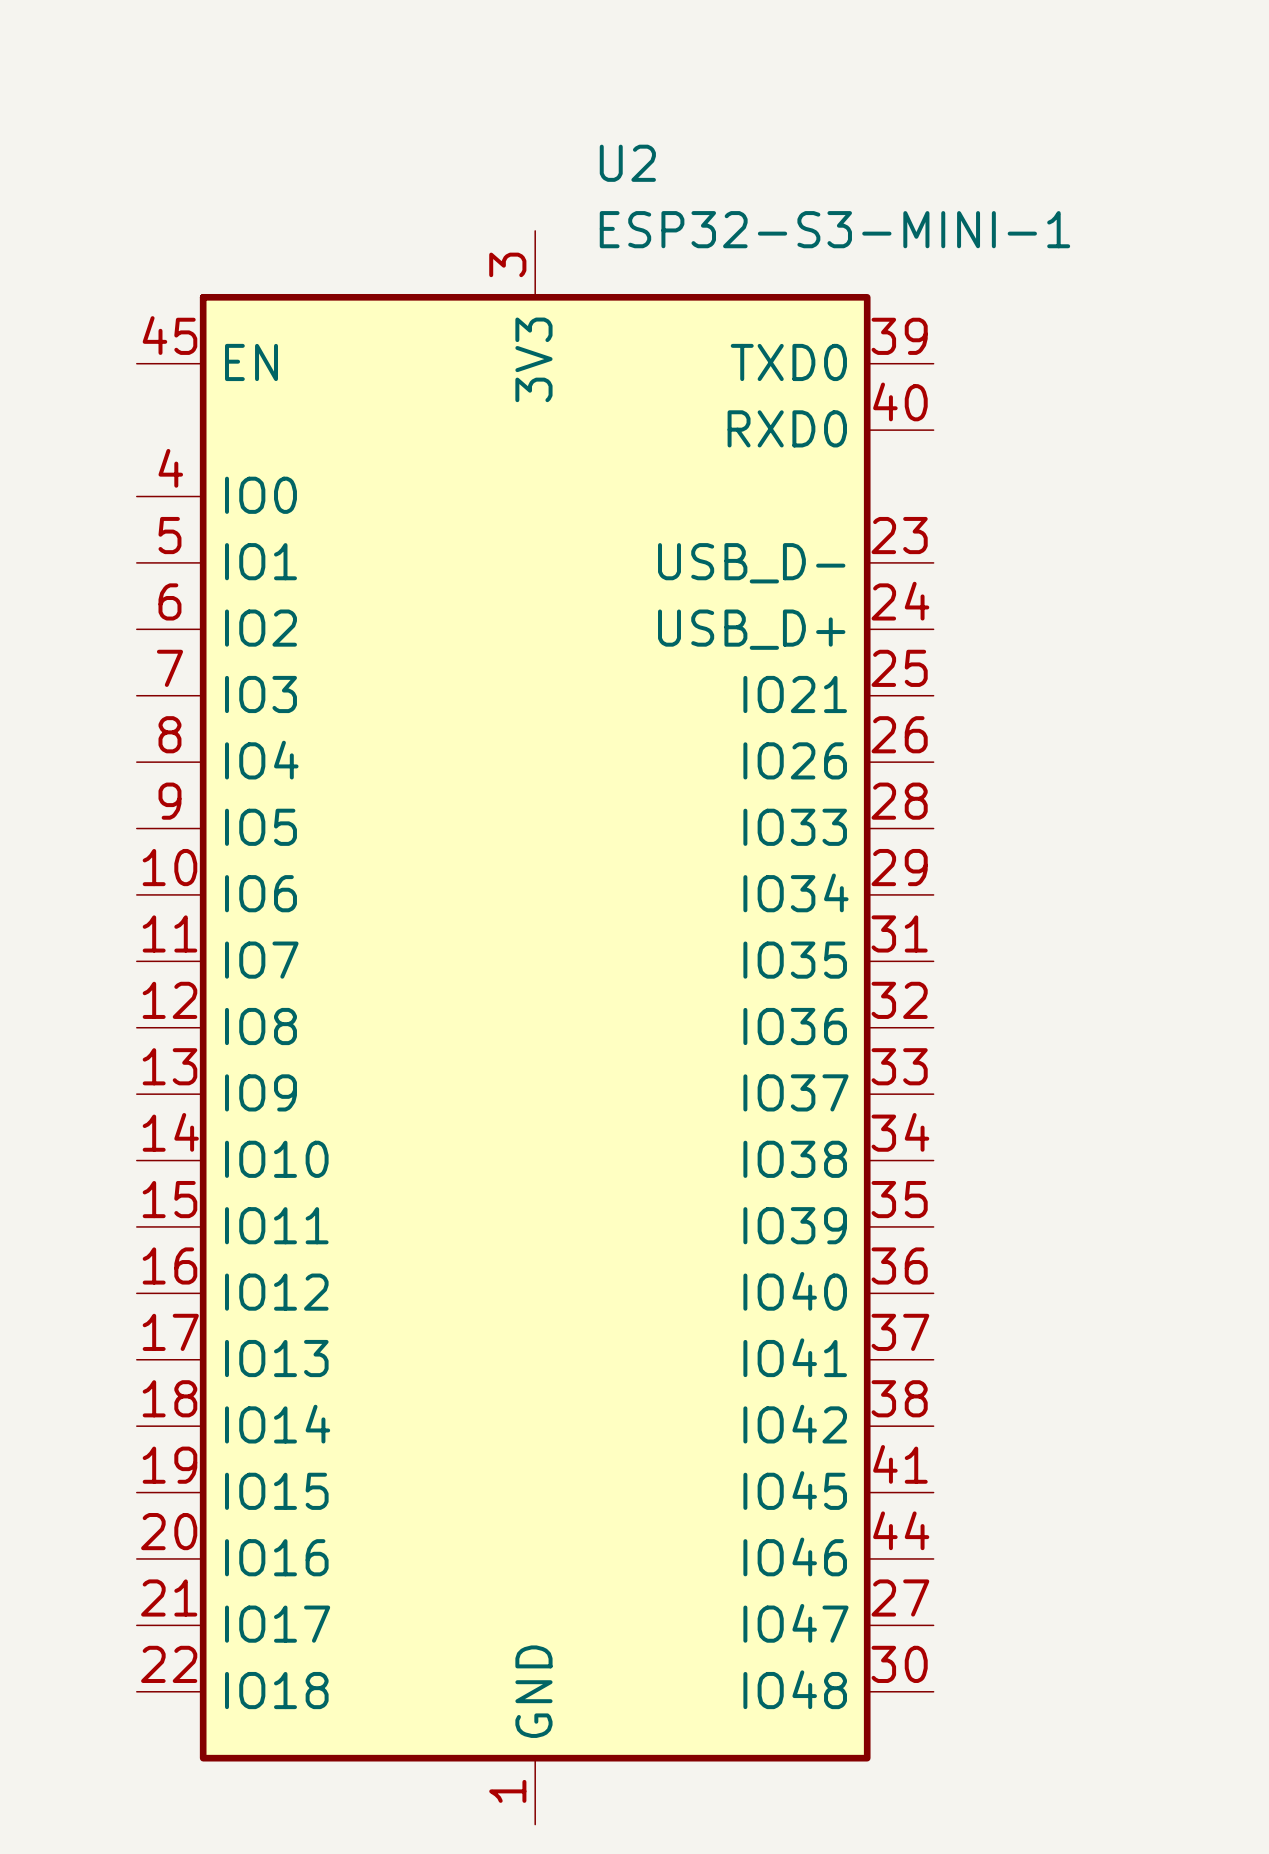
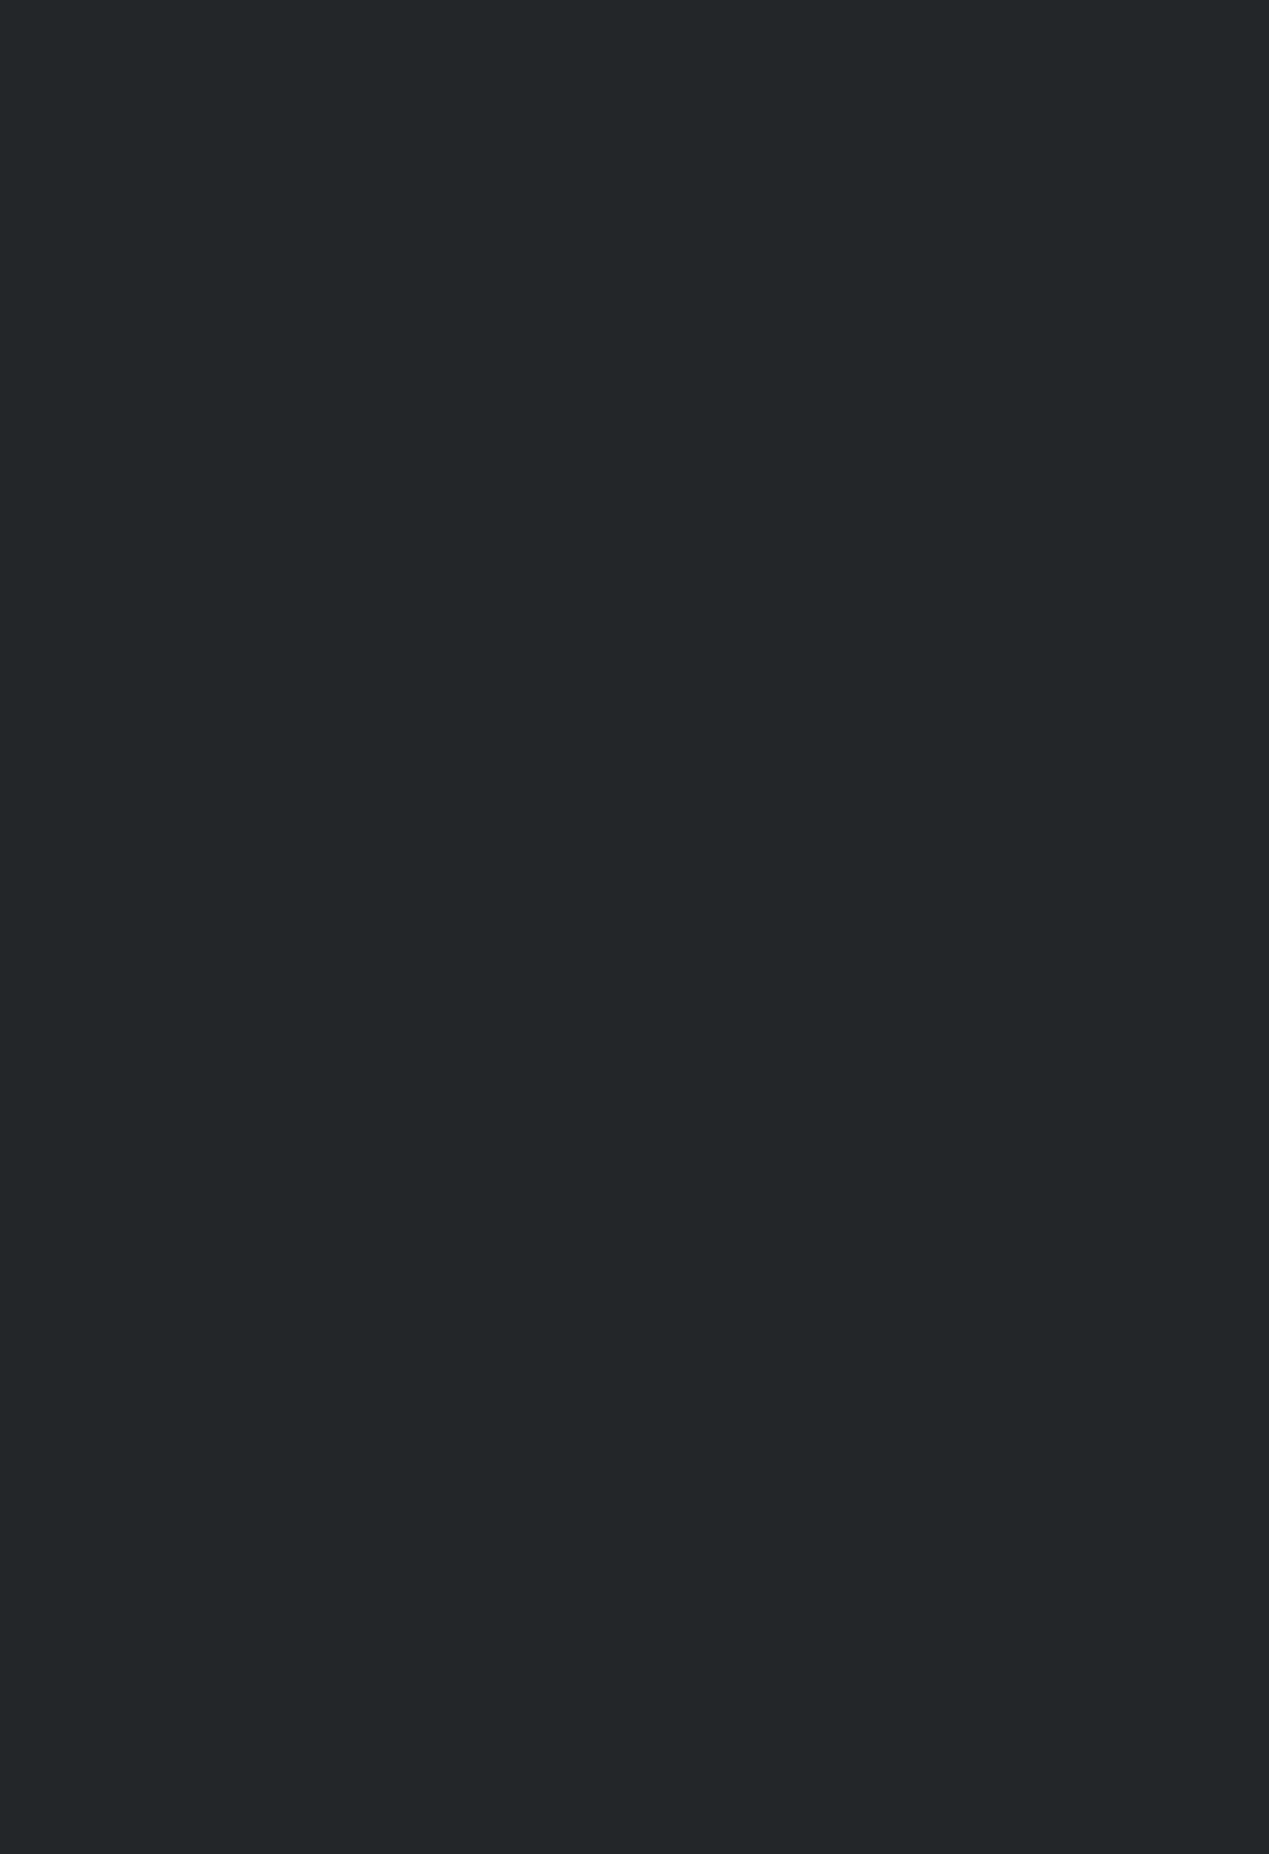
U2: ESP32-S3-MINI-1 (535, 1027) -> none

